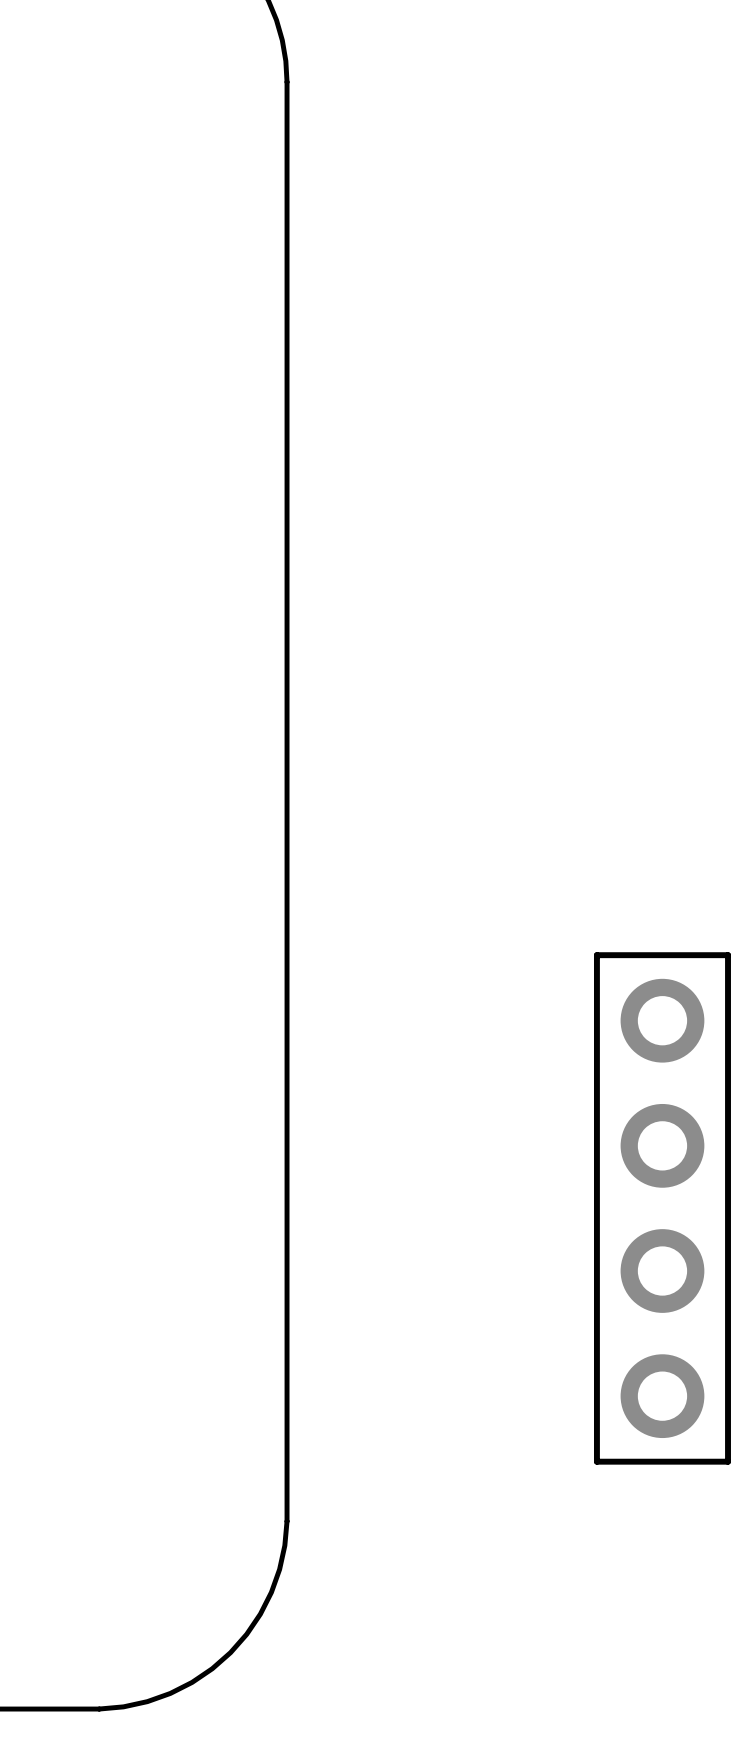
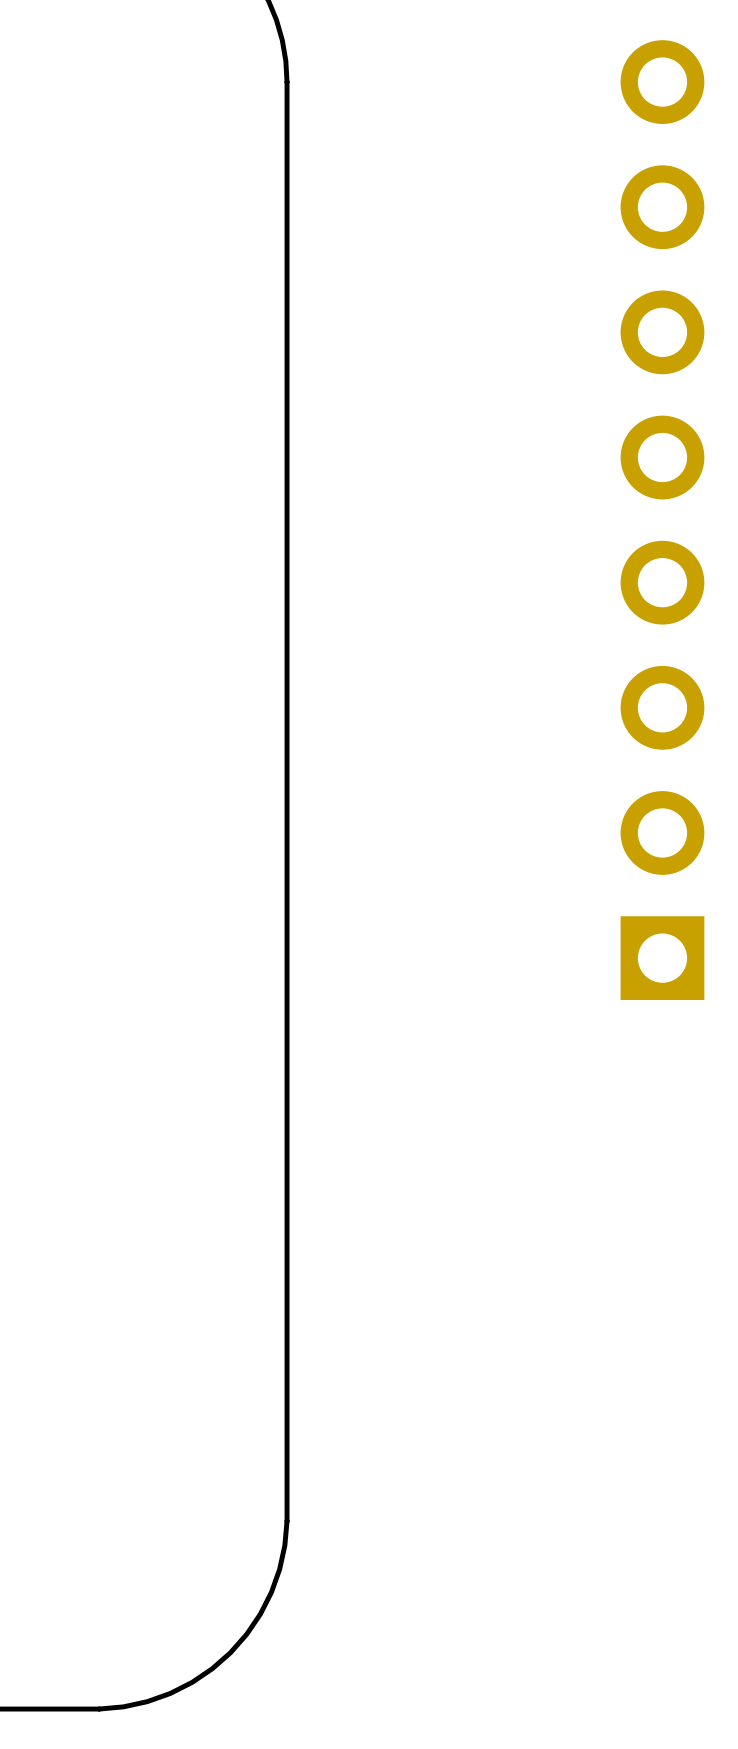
part: none -> (662, 520)
part: (662, 1208) -> none

